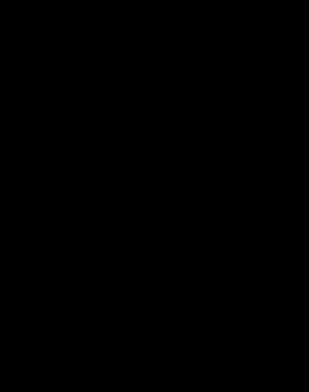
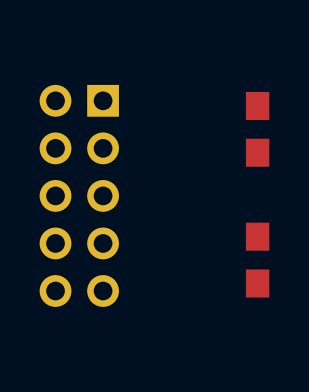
part: none -> (257, 129)
part: none -> (79, 195)
part: none -> (257, 260)

